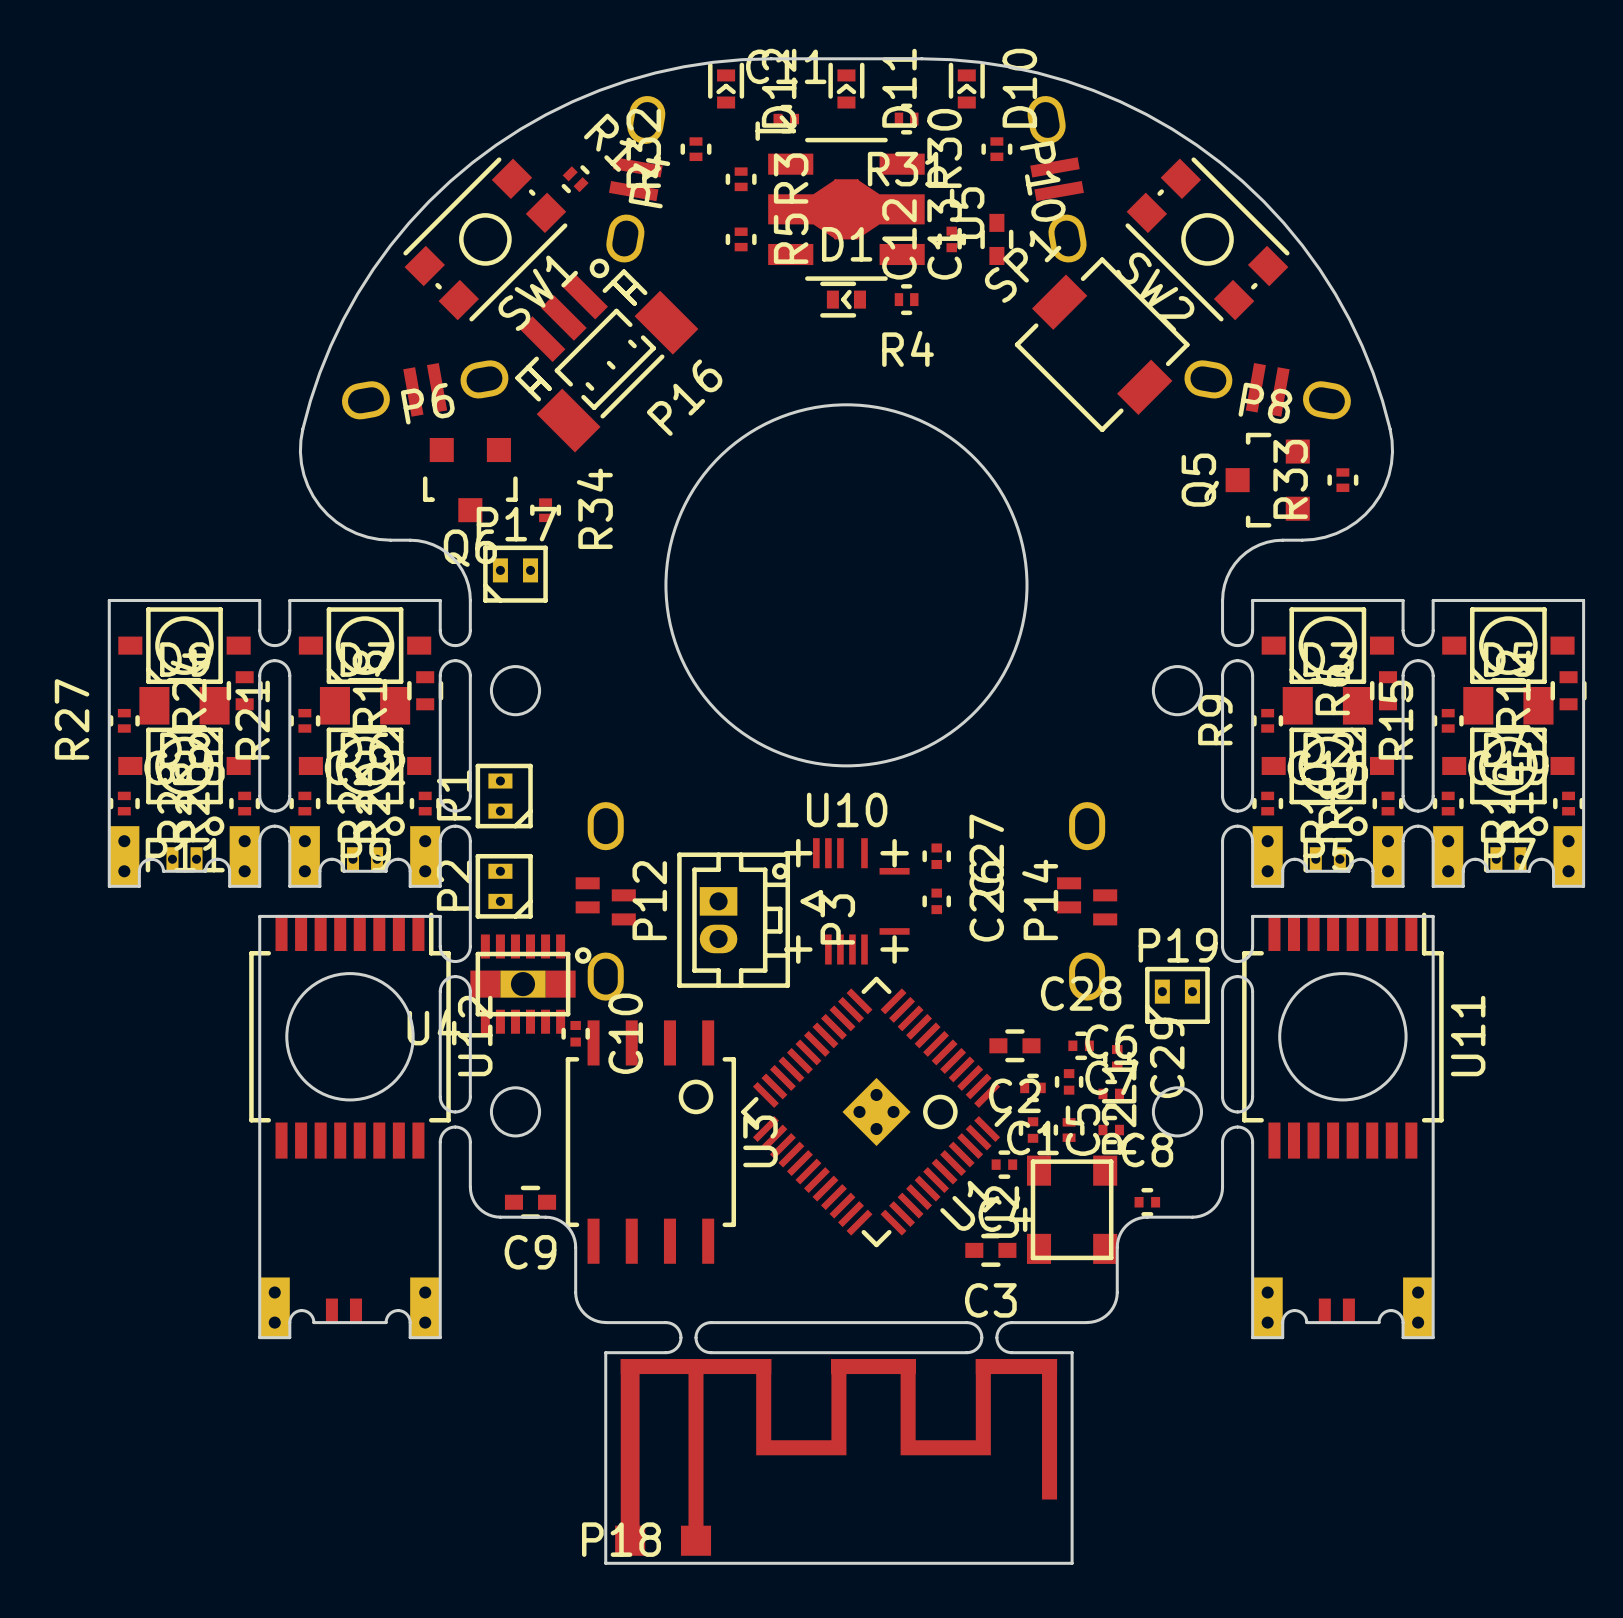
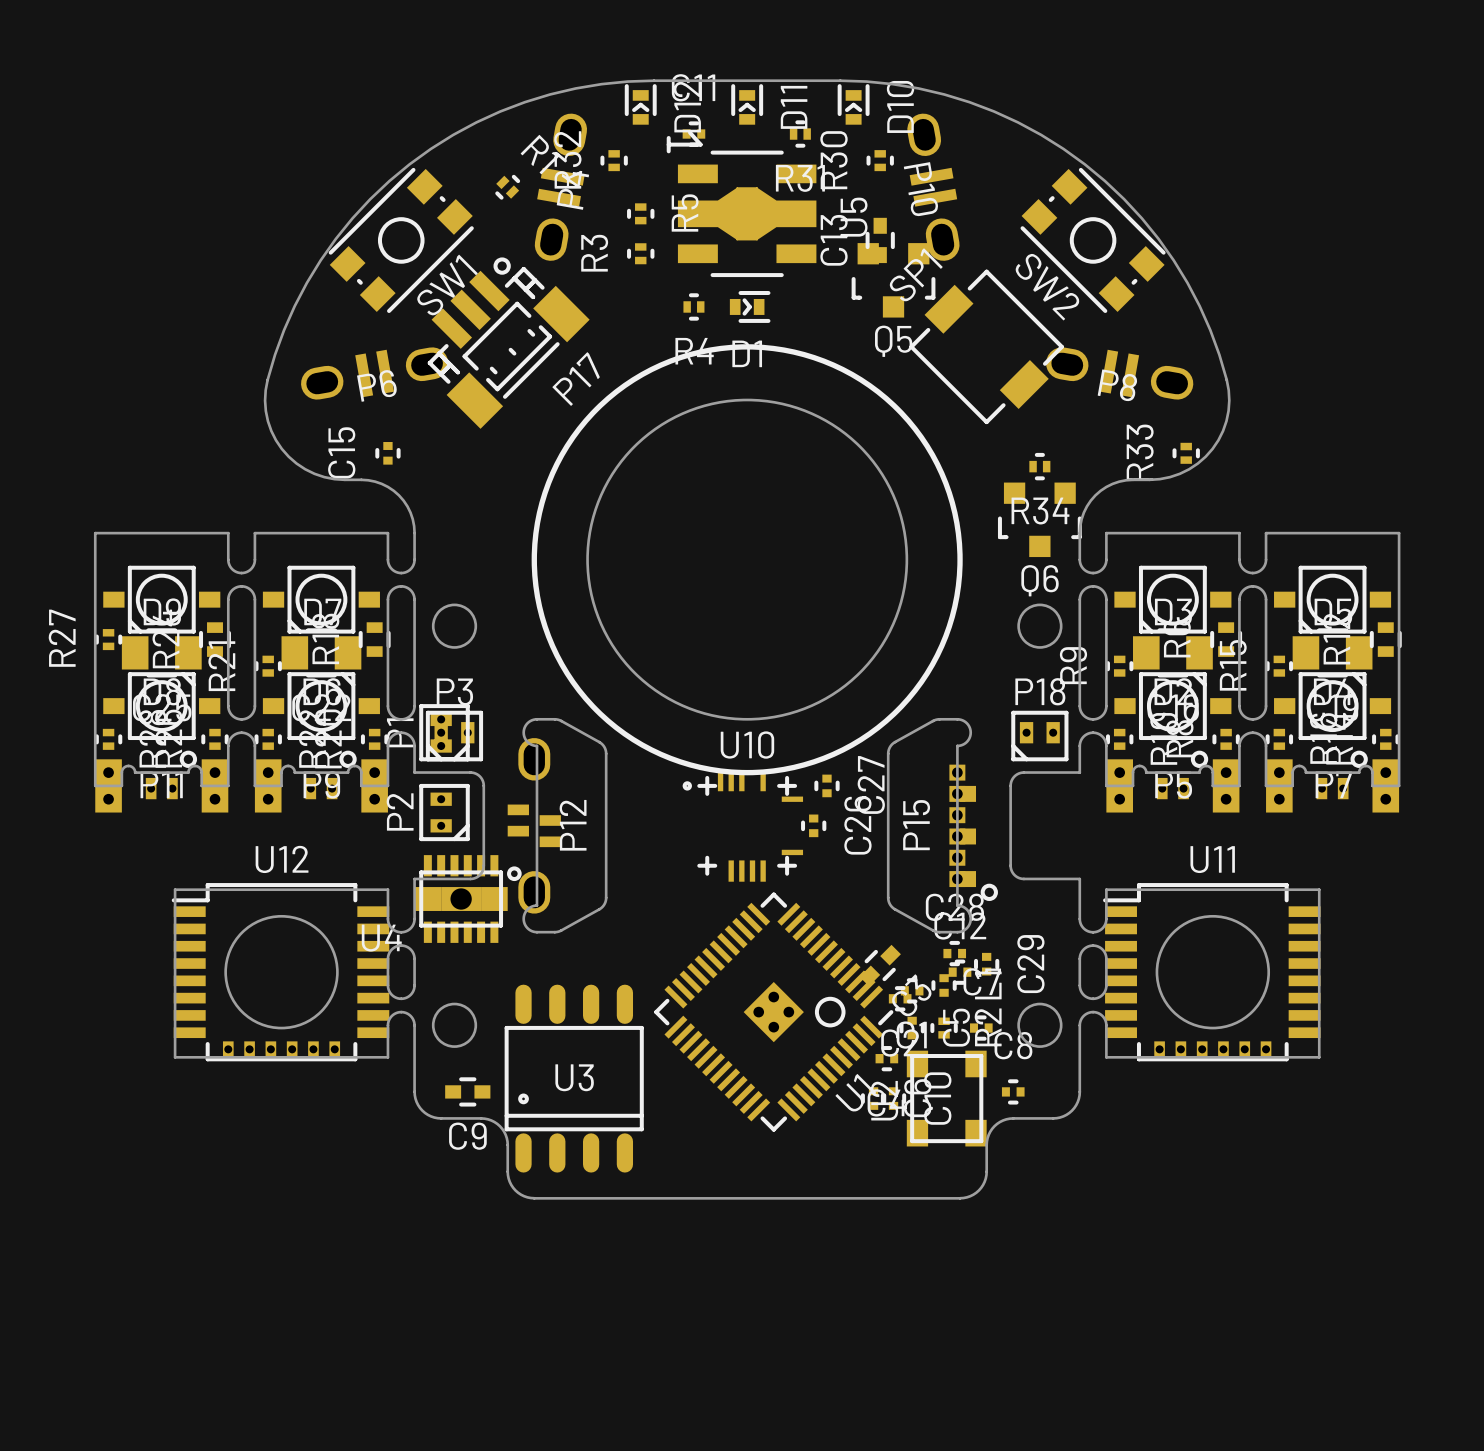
board edge: (771, 58) (712, 62) (655, 72) (599, 90) (572, 101) (520, 129) (472, 162) (429, 201) (390, 245) (373, 269) (343, 319) (319, 373) (302, 429) (300, 452) (307, 486) (319, 505) (346, 528) (379, 539) (425, 542) (440, 548) (452, 557) (465, 577) (469, 592) (470, 632) (464, 642) (453, 645) (446, 642) (442, 638) (440, 630) (440, 600) (289, 600) (289, 634) (283, 642) (274, 645) (265, 642) (260, 634) (259, 600) (109, 600) -> (680, 80) (601, 84) (550, 94) (500, 111) (453, 134) (409, 164) (370, 199) (335, 238) (306, 282) (284, 330) (267, 380) (265, 400) (271, 430) (288, 456) (305, 469) (334, 479) (375, 481) (387, 486) (399, 495) (410, 512) (414, 526) (414, 561) (409, 570) (399, 572) (389, 566) (387, 533) (254, 533) (254, 563) (249, 570) (243, 572) (234, 571) (229, 564) (228, 533) (95, 533) (95, 559)
board edge: (921, 58) (950, 59) (1009, 66) (1065, 80) (1120, 101) (1172, 129) (1220, 162) (1263, 201) (1302, 245) (1319, 269) (1349, 319) (1373, 373) (1390, 429) (1391, 463) (1385, 486) (1365, 514) (1346, 528) (1313, 539) (1267, 542) (1252, 548) (1240, 557) (1227, 577) (1223, 592) (1222, 632) (1228, 642) (1239, 645) (1246, 642) (1250, 638) (1252, 630) (1252, 600) (1403, 600) (1403, 634) (1408, 642) (1418, 645) (1427, 642) (1432, 634) (1433, 600) (1583, 600) -> (813, 80) (892, 84) (944, 94) (994, 111) (1041, 134) (1084, 164) (1124, 199) (1158, 238) (1187, 282) (1210, 330) (1226, 380) (1228, 410) (1223, 430) (1212, 448) (1189, 469) (1159, 479) (1119, 481) (1106, 486) (1095, 495) (1083, 512) (1080, 526) (1079, 561) (1084, 570) (1094, 572) (1104, 566) (1106, 533) (1239, 533) (1239, 563) (1244, 570) (1251, 572) (1259, 571) (1265, 564) (1266, 533) (1399, 533) (1399, 559)
R3 name position: R3 (791, 178) -> R3 (594, 253)
R3 position: (741, 179) -> (640, 253)
SW1 position: (485, 239) -> (401, 240)
R5 position: (741, 239) -> (640, 213)
C12 rotation: 0° (951, 239) -> 90° clockwise (960, 972)
C12 position: (951, 239) -> (960, 972)
SW2 position: (1207, 239) -> (1093, 240)
D1 rotation: 0° (843, 299) -> 180° (750, 306)
R4 position: (906, 299) -> (693, 306)
SP1 position: (1102, 344) -> (986, 346)
P16: (606, 355) -> none
drawing: none -> [531, 344, 963, 776]
C15: none -> (387, 453)
Q6 position: (470, 480) -> (1039, 519)
Q5 rotation: 0° (1267, 480) -> 90° counterclockwise (893, 280)
Q5 position: (1267, 480) -> (893, 280)
R34 rotation: 0° (545, 510) -> 90° clockwise (1039, 466)
R34 position: (545, 510) -> (1039, 466)
P17 name position: P17 (516, 524) -> P17 (576, 379)
P17 footprint: [483, 545, 548, 603] -> [427, 257, 590, 429]
round board edge position: (846, 585) -> (747, 559)
board edge: (259, 675) (264, 665) (274, 660) (285, 665) (289, 675) -> (228, 626) (228, 596) (233, 589) (241, 586) (249, 589) (254, 596) (254, 626)
board edge: (440, 675) (444, 665) (455, 660) (465, 665) (470, 675) -> (387, 626) (388, 596) (393, 589) (401, 586) (409, 589) (414, 596) (414, 626)
board edge: (1222, 675) (1226, 665) (1237, 660) (1248, 665) (1252, 675) -> (1079, 626) (1080, 596) (1084, 589) (1093, 586) (1101, 589) (1105, 596) (1106, 626)
board edge: (1403, 675) (1407, 665) (1418, 660) (1428, 665) (1433, 675) -> (1239, 626) (1239, 596) (1244, 589) (1252, 586) (1260, 589) (1265, 596) (1266, 626)
round board edge position: (515, 690) -> (454, 626)
round board edge position: (1177, 690) -> (1039, 626)
R27 position: (124, 720) -> (108, 639)
board edge: (259, 765) (260, 799) (265, 807) (274, 811) (283, 807) (289, 799) (289, 765) -> (228, 706) (232, 715) (241, 719) (251, 715) (254, 706)
board edge: (440, 765) (440, 799) (446, 807) (455, 811) (464, 807) (469, 799) (470, 765) -> (387, 706) (391, 715) (401, 719) (410, 715) (414, 706)
board edge: (1222, 765) (1223, 799) (1228, 807) (1237, 811) (1246, 807) (1252, 799) (1252, 765) -> (1079, 706) (1083, 715) (1093, 719) (1102, 715) (1106, 706)
board edge: (1403, 765) (1403, 799) (1408, 807) (1418, 811) (1427, 807) (1432, 799) (1433, 765) -> (1239, 706) (1243, 715) (1252, 719) (1262, 715) (1266, 706)
board edge: none -> (536, 719) (561, 720) (600, 742) (606, 752) (605, 901) (599, 909) (556, 932) (531, 931) (526, 926) (523, 920) (527, 909) (536, 905) (536, 745) (527, 742) (523, 732) (527, 723) (536, 719)
board edge: none -> (939, 719) (962, 720) (967, 724) (970, 730) (966, 742) (957, 745) (957, 905) (966, 909) (970, 918) (966, 928) (959, 932) (934, 931) (893, 908) (888, 899) (888, 749) (895, 742) (939, 719)
U10 footprint: [771, 838, 910, 965] -> [682, 769, 804, 882]
board edge: (259, 841) (264, 830) (274, 826) (285, 830) (289, 841) -> (228, 772) (228, 742) (233, 735) (241, 732) (249, 735) (254, 742) (254, 772)
board edge: (440, 841) (444, 830) (453, 826) (464, 829) (470, 839) (470, 948) (467, 955) (461, 960) (449, 960) (441, 952) (440, 916) (259, 916) (259, 1337) (289, 1337) (290, 1317) (294, 1313) (301, 1310) (310, 1314) (313, 1322) (386, 1322) (389, 1314) (399, 1310) (405, 1313) (409, 1317) (410, 1337) (440, 1337) (440, 1163) -> (387, 905) (387, 889) (175, 889) (175, 1057) (387, 1057)
board edge: (1252, 841) (1248, 830) (1239, 826) (1228, 829) (1222, 839) (1222, 948) (1225, 955) (1231, 960) (1243, 960) (1251, 952) (1252, 916) (1433, 916) (1433, 1337) (1403, 1337) (1402, 1317) (1398, 1313) (1391, 1310) (1382, 1314) (1379, 1322) (1306, 1322) (1303, 1314) (1293, 1310) (1287, 1313) (1283, 1317) (1282, 1337) (1252, 1337) (1252, 1163) -> (1106, 905) (1106, 889) (1319, 889) (1319, 1057) (1106, 1057)
board edge: (1403, 841) (1407, 830) (1418, 826) (1428, 830) (1433, 841) -> (1239, 772) (1239, 742) (1244, 735) (1252, 732) (1260, 735) (1265, 742) (1266, 772)
P3 footprint: [677, 852, 824, 988] -> [425, 710, 484, 762]
board edge: (109, 856) (109, 886) (139, 886) (140, 866) (144, 861) (151, 859) (159, 862) (163, 871) (205, 871) (210, 861) (220, 859) (226, 862) (229, 868) (229, 886) (259, 886) (259, 856) -> (95, 785) (121, 785) (122, 770) (128, 765) (133, 767) (135, 772) (188, 772) (190, 767) (196, 766) (201, 770) (201, 785) (228, 785)
board edge: (289, 856) (289, 886) (319, 886) (320, 866) (324, 861) (331, 859) (340, 862) (343, 871) (386, 871) (390, 861) (401, 859) (406, 862) (409, 868) (410, 886) (440, 886) (440, 856) -> (254, 785) (281, 785) (281, 770) (288, 765) (292, 767) (294, 772) (348, 772) (350, 767) (356, 766) (361, 770) (361, 785) (387, 785)
board edge: (1252, 856) (1252, 886) (1282, 886) (1283, 866) (1287, 861) (1294, 859) (1303, 862) (1306, 871) (1348, 871) (1353, 861) (1364, 859) (1369, 862) (1372, 868) (1372, 886) (1403, 886) (1403, 856) -> (1106, 785) (1132, 785) (1133, 770) (1139, 765) (1144, 767) (1146, 772) (1199, 772) (1202, 767) (1207, 766) (1212, 770) (1212, 785) (1239, 785)
board edge: (1433, 856) (1433, 886) (1463, 886) (1464, 866) (1467, 861) (1475, 859) (1483, 862) (1487, 871) (1529, 871) (1534, 861) (1544, 859) (1549, 862) (1553, 868) (1553, 886) (1583, 886) (1583, 856) -> (1266, 785) (1292, 785) (1292, 770) (1299, 765) (1304, 767) (1305, 772) (1359, 772) (1361, 767) (1367, 766) (1372, 770) (1372, 785) (1399, 785)
C26 position: (936, 901) -> (813, 825)
P14: (1087, 901) -> none
P15: none -> (973, 832)
P3 name position: P3 (837, 919) -> P3 (454, 691)
board edge: (440, 991) (444, 980) (455, 976) (465, 980) (470, 991) -> (387, 772) (388, 740) (394, 734) (402, 732) (409, 735) (414, 742) (414, 772) (472, 772) (478, 775) (483, 782) (483, 865) (481, 872) (472, 878) (414, 878) (414, 905)
board edge: (1222, 991) (1226, 980) (1237, 976) (1248, 980) (1252, 991) -> (1079, 905) (1079, 878) (1022, 878) (1012, 872) (1010, 865) (1011, 782) (1015, 775) (1022, 772) (1079, 772) (1080, 742) (1084, 735) (1091, 732) (1099, 734) (1105, 740) (1106, 772)
P19: (1177, 995) -> none
board edge: (440, 1006) (440, 1051) -> (387, 918) (391, 928) (401, 932) (410, 928) (414, 918)
board edge: (470, 1006) (470, 1051) -> (387, 958) (391, 949) (401, 945) (410, 949) (414, 958)
board edge: (1222, 1006) (1222, 1051) -> (1079, 918) (1083, 928) (1093, 932) (1102, 928) (1106, 918)
board edge: (1252, 1006) (1252, 1051) -> (1079, 958) (1083, 949) (1093, 945) (1102, 949) (1106, 958)
U3 footprint: [565, 1020, 737, 1264] -> [504, 984, 644, 1173]
C2 footprint: [989, 1029, 1041, 1063] -> [888, 986, 912, 1012]
C10 position: (575, 1033) -> (893, 1098)
U12 rotation: 0° (349, 1035) -> 90° counterclockwise (280, 972)
U11 rotation: 0° (1342, 1035) -> 90° counterclockwise (1211, 972)
round board edge position: (349, 1036) -> (281, 972)
round board edge position: (1342, 1036) -> (1212, 972)
board edge: (440, 1081) (442, 1104) (447, 1109) (455, 1111) (462, 1109) (468, 1104) (470, 1081) -> (387, 985) (391, 994) (401, 998) (410, 994) (414, 985)
board edge: (1222, 1081) (1224, 1104) (1230, 1109) (1237, 1111) (1245, 1109) (1250, 1104) (1252, 1081) -> (1079, 985) (1083, 994) (1093, 998) (1102, 994) (1106, 985)
C6 rotation: 0° (1111, 1093) -> 90° clockwise (873, 1098)
C6 position: (1111, 1093) -> (873, 1098)
round board edge position: (515, 1111) -> (454, 1025)
round board edge position: (1177, 1111) -> (1039, 1025)
U3 name position: U3 (760, 1141) -> U3 (574, 1077)
board edge: (440, 1142) (444, 1131) (455, 1127) (465, 1131) (470, 1142) -> (387, 1038) (389, 1018) (394, 1013) (401, 1012) (407, 1013) (412, 1018) (414, 1038)
board edge: (1222, 1142) (1226, 1131) (1237, 1127) (1248, 1131) (1252, 1142) -> (1079, 1038) (1081, 1018) (1086, 1013) (1093, 1012) (1099, 1013) (1104, 1018) (1106, 1038)
part: none -> (281, 1049)
part: none -> (1212, 1049)
board edge: (470, 1187) (471, 1194) (476, 1205) (488, 1214) (500, 1217) (549, 1217) (563, 1223) (569, 1228) (574, 1239) (575, 1262) -> (414, 1078) (415, 1098) (425, 1112) (437, 1118) (481, 1118) (491, 1120) (502, 1128) (507, 1145)
board edge: (1222, 1187) (1221, 1194) (1216, 1205) (1204, 1214) (1192, 1217) (1143, 1217) (1129, 1223) (1123, 1228) (1118, 1239) (1117, 1262) -> (1079, 1078) (1078, 1098) (1069, 1112) (1056, 1118) (1013, 1118) (1003, 1120) (992, 1128) (986, 1145)
C3 rotation: 0° (990, 1250) -> 45° counterclockwise (880, 965)
C3 position: (990, 1250) -> (880, 965)
part: (349, 1307) -> none
part: (1342, 1307) -> none
board edge: (665, 1322) (675, 1325) (680, 1333) (679, 1343) (673, 1350) (665, 1352) (605, 1352) (605, 1563) (1072, 1563) (1072, 1352) (1011, 1352) (1004, 1350) (998, 1343) (997, 1333) (1002, 1325) (1011, 1322) -> (587, 1198) (627, 1198)
board edge: (711, 1322) (700, 1327) (696, 1337) (700, 1348) (711, 1352) (968, 1352) (977, 1348) (981, 1337) (977, 1327) (966, 1322) -> (893, 1198) (853, 1198)
P18 footprint: [615, 1359, 1058, 1556] -> [1011, 710, 1069, 762]
P18 name position: P18 (621, 1539) -> P18 (1040, 691)

